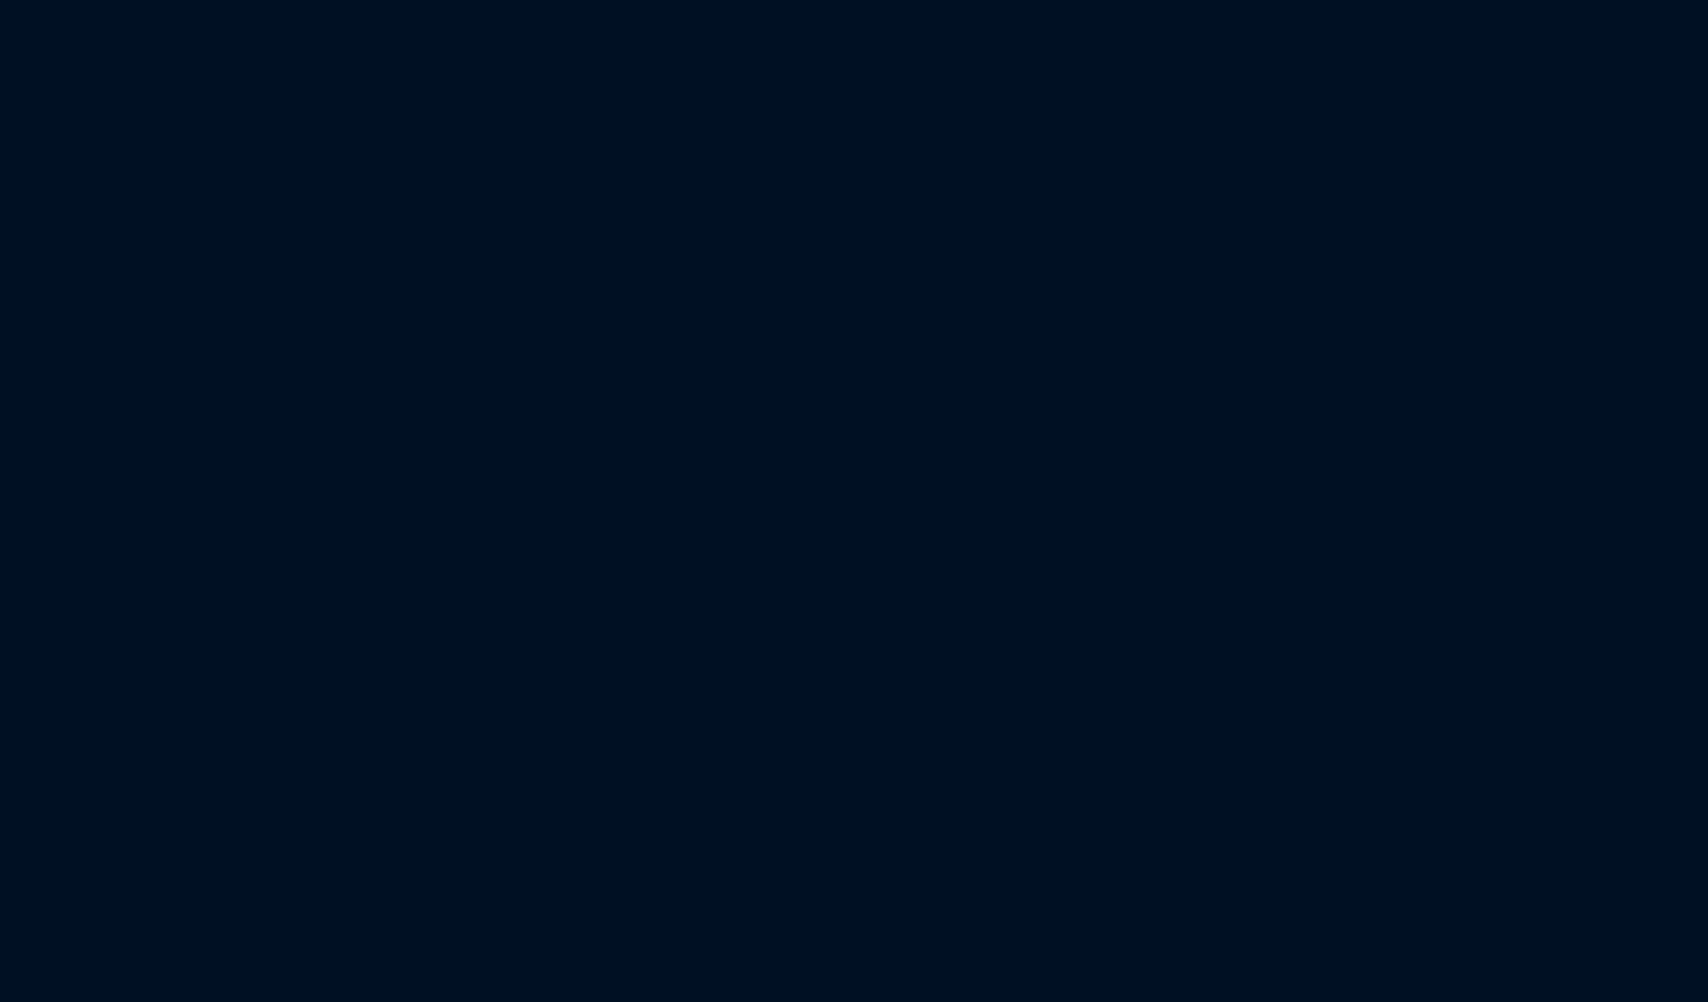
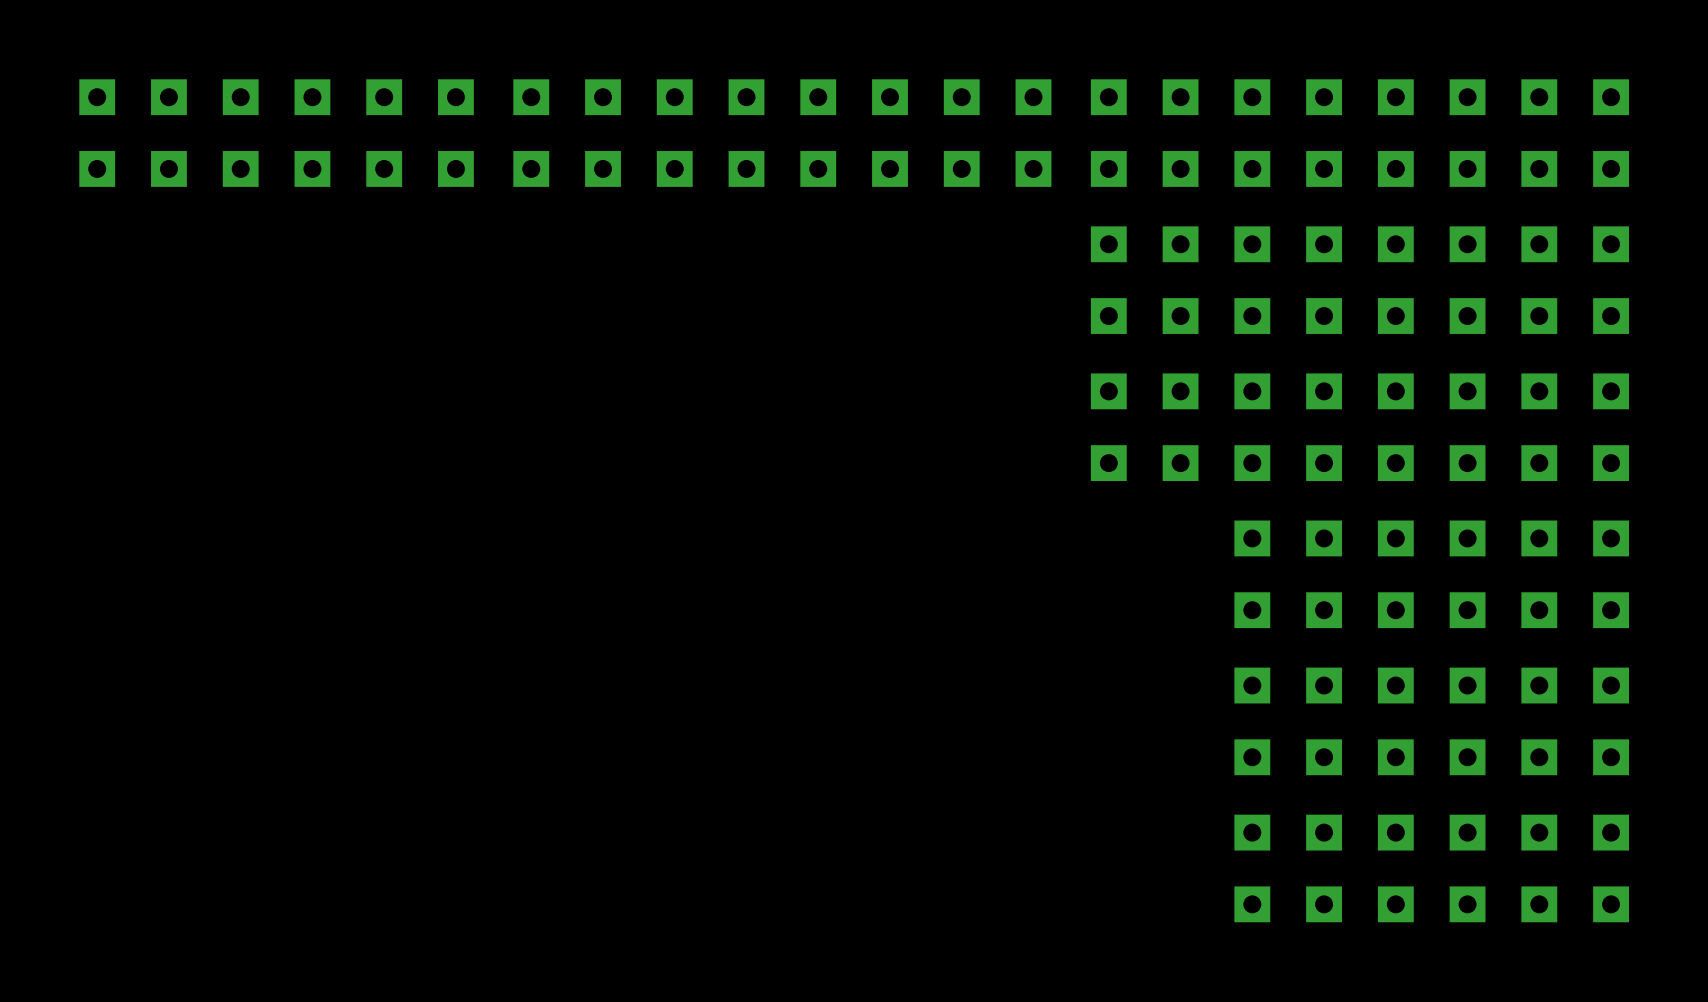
part: none -> (276, 133)
part: none -> (782, 133)
part: none -> (1359, 133)
part: none -> (1359, 280)
part: none -> (1359, 427)
part: none -> (1431, 574)
part: none -> (1431, 721)
part: none -> (1431, 868)

